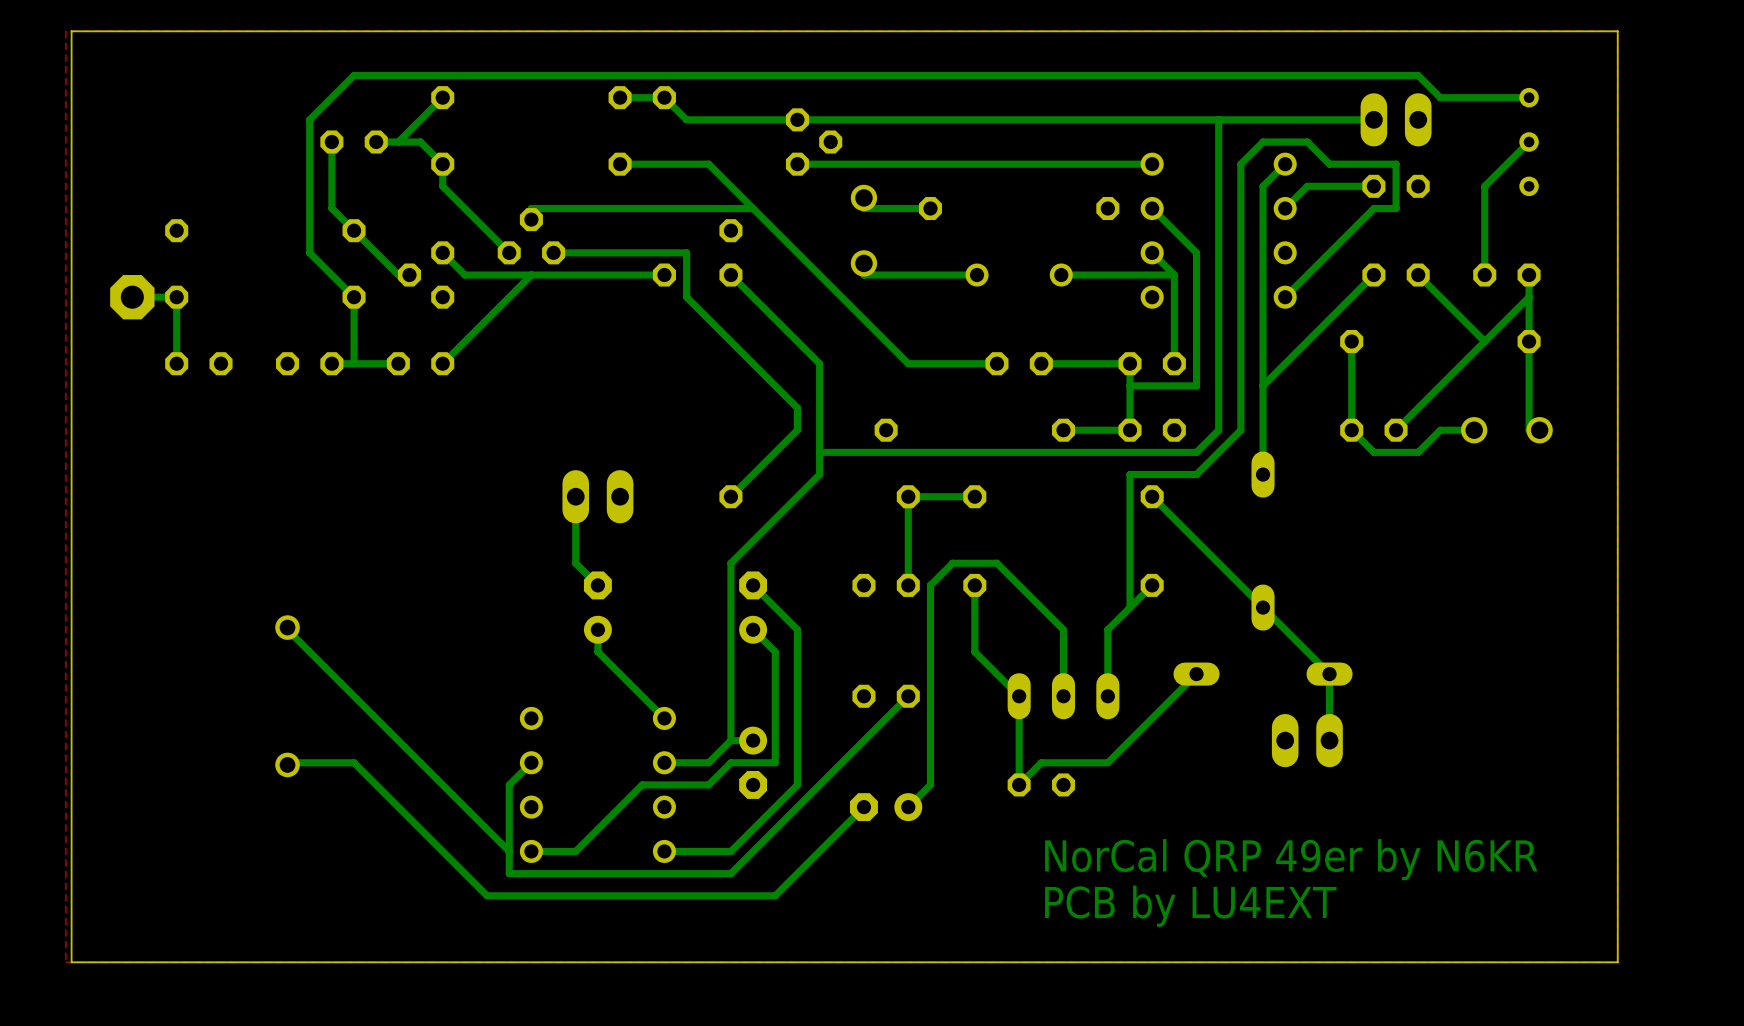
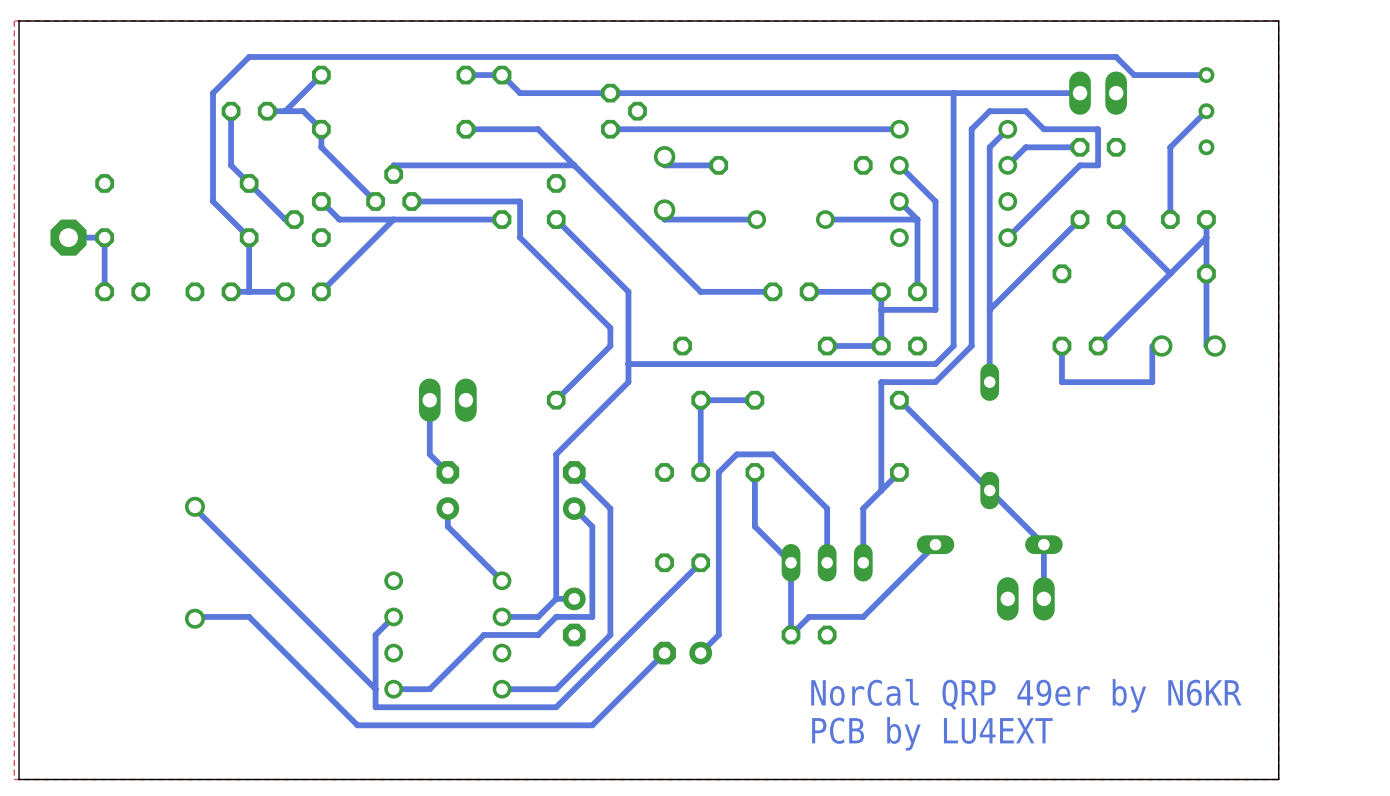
bottom track: (1351, 341) (1351, 430) (1373, 452) (1418, 452) (1440, 430) (1474, 430) -> none
bottom track: none -> (1152, 346) (1152, 382) (1061, 382) (1061, 346)

